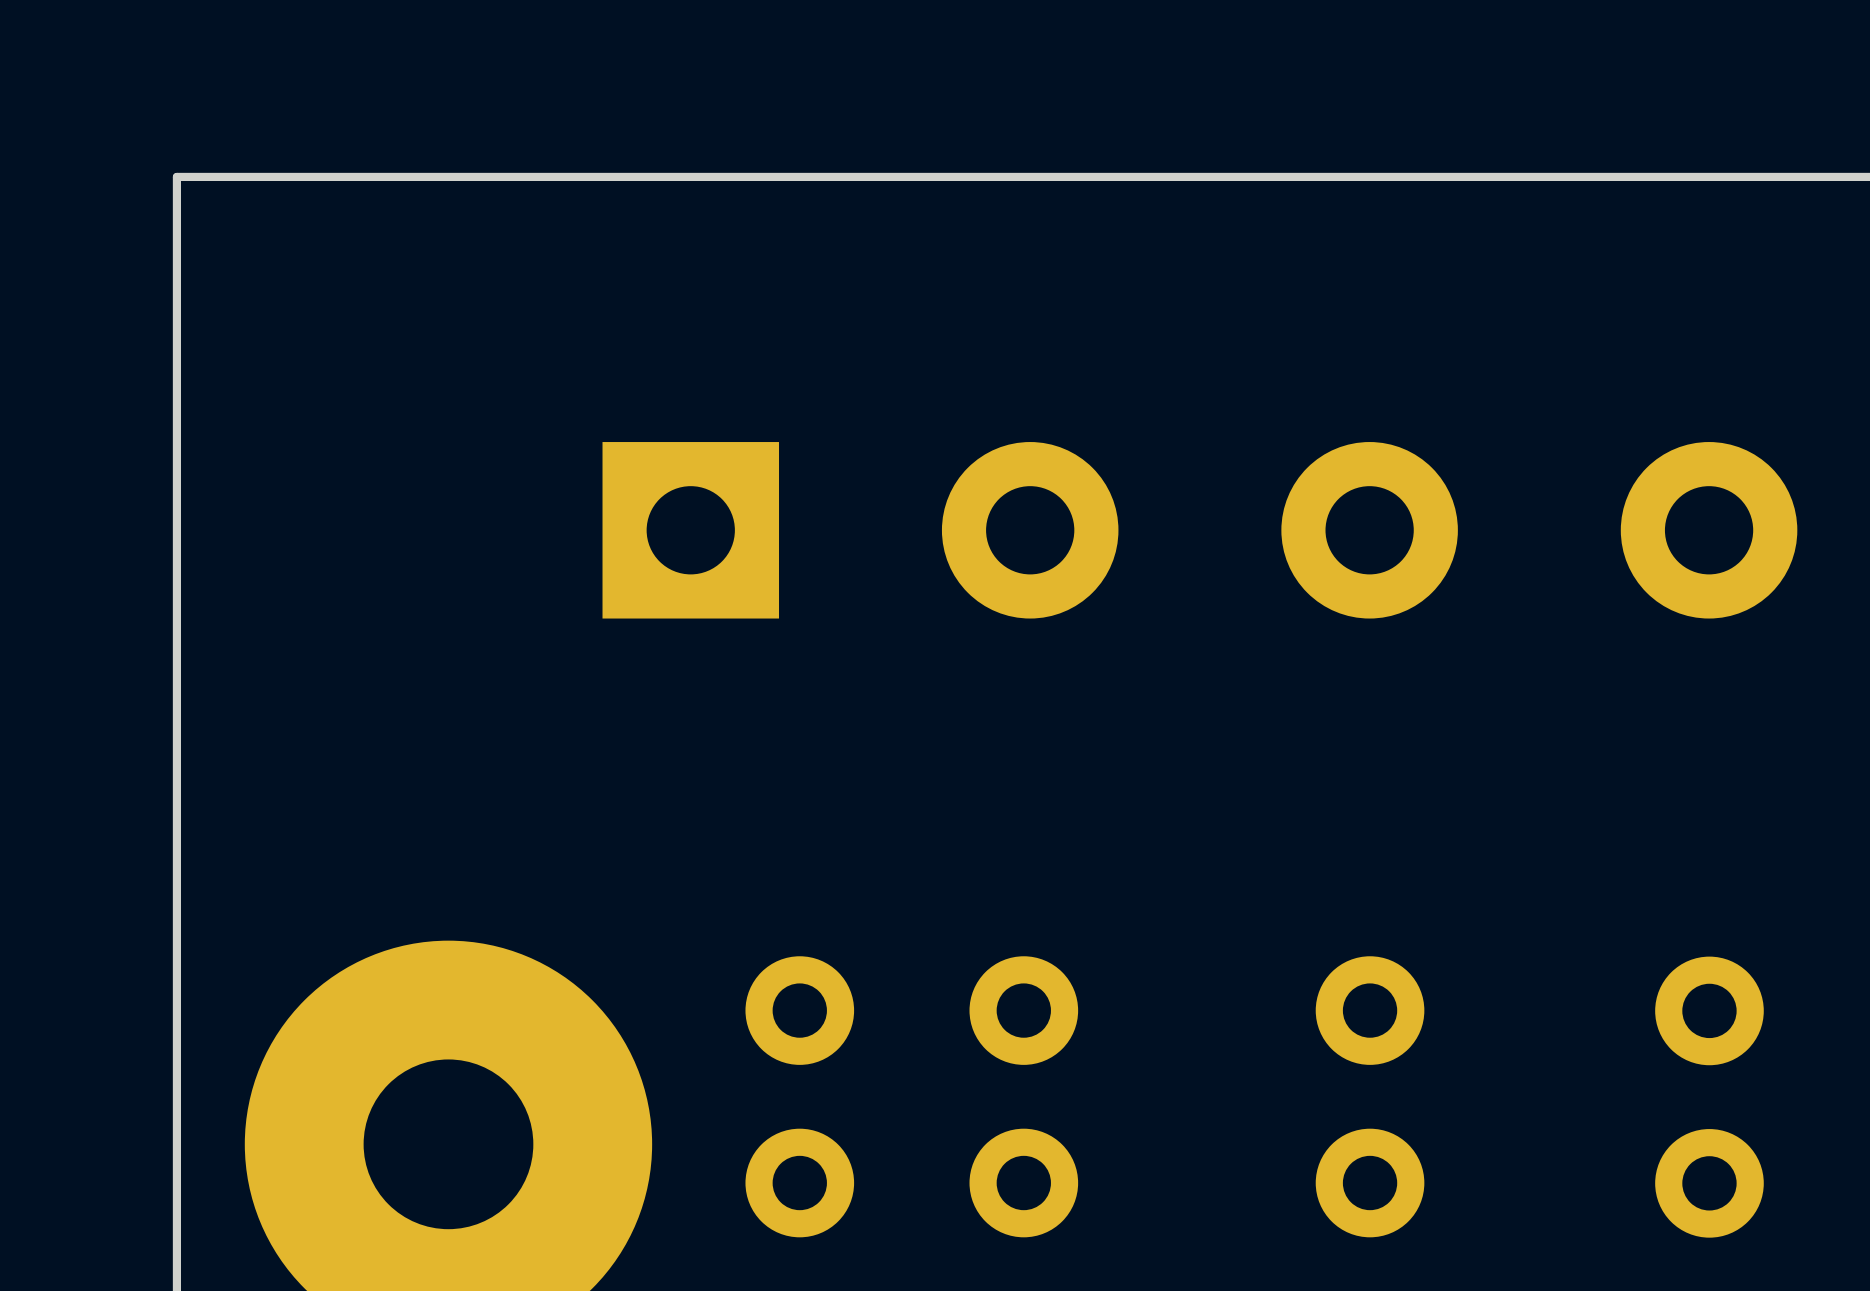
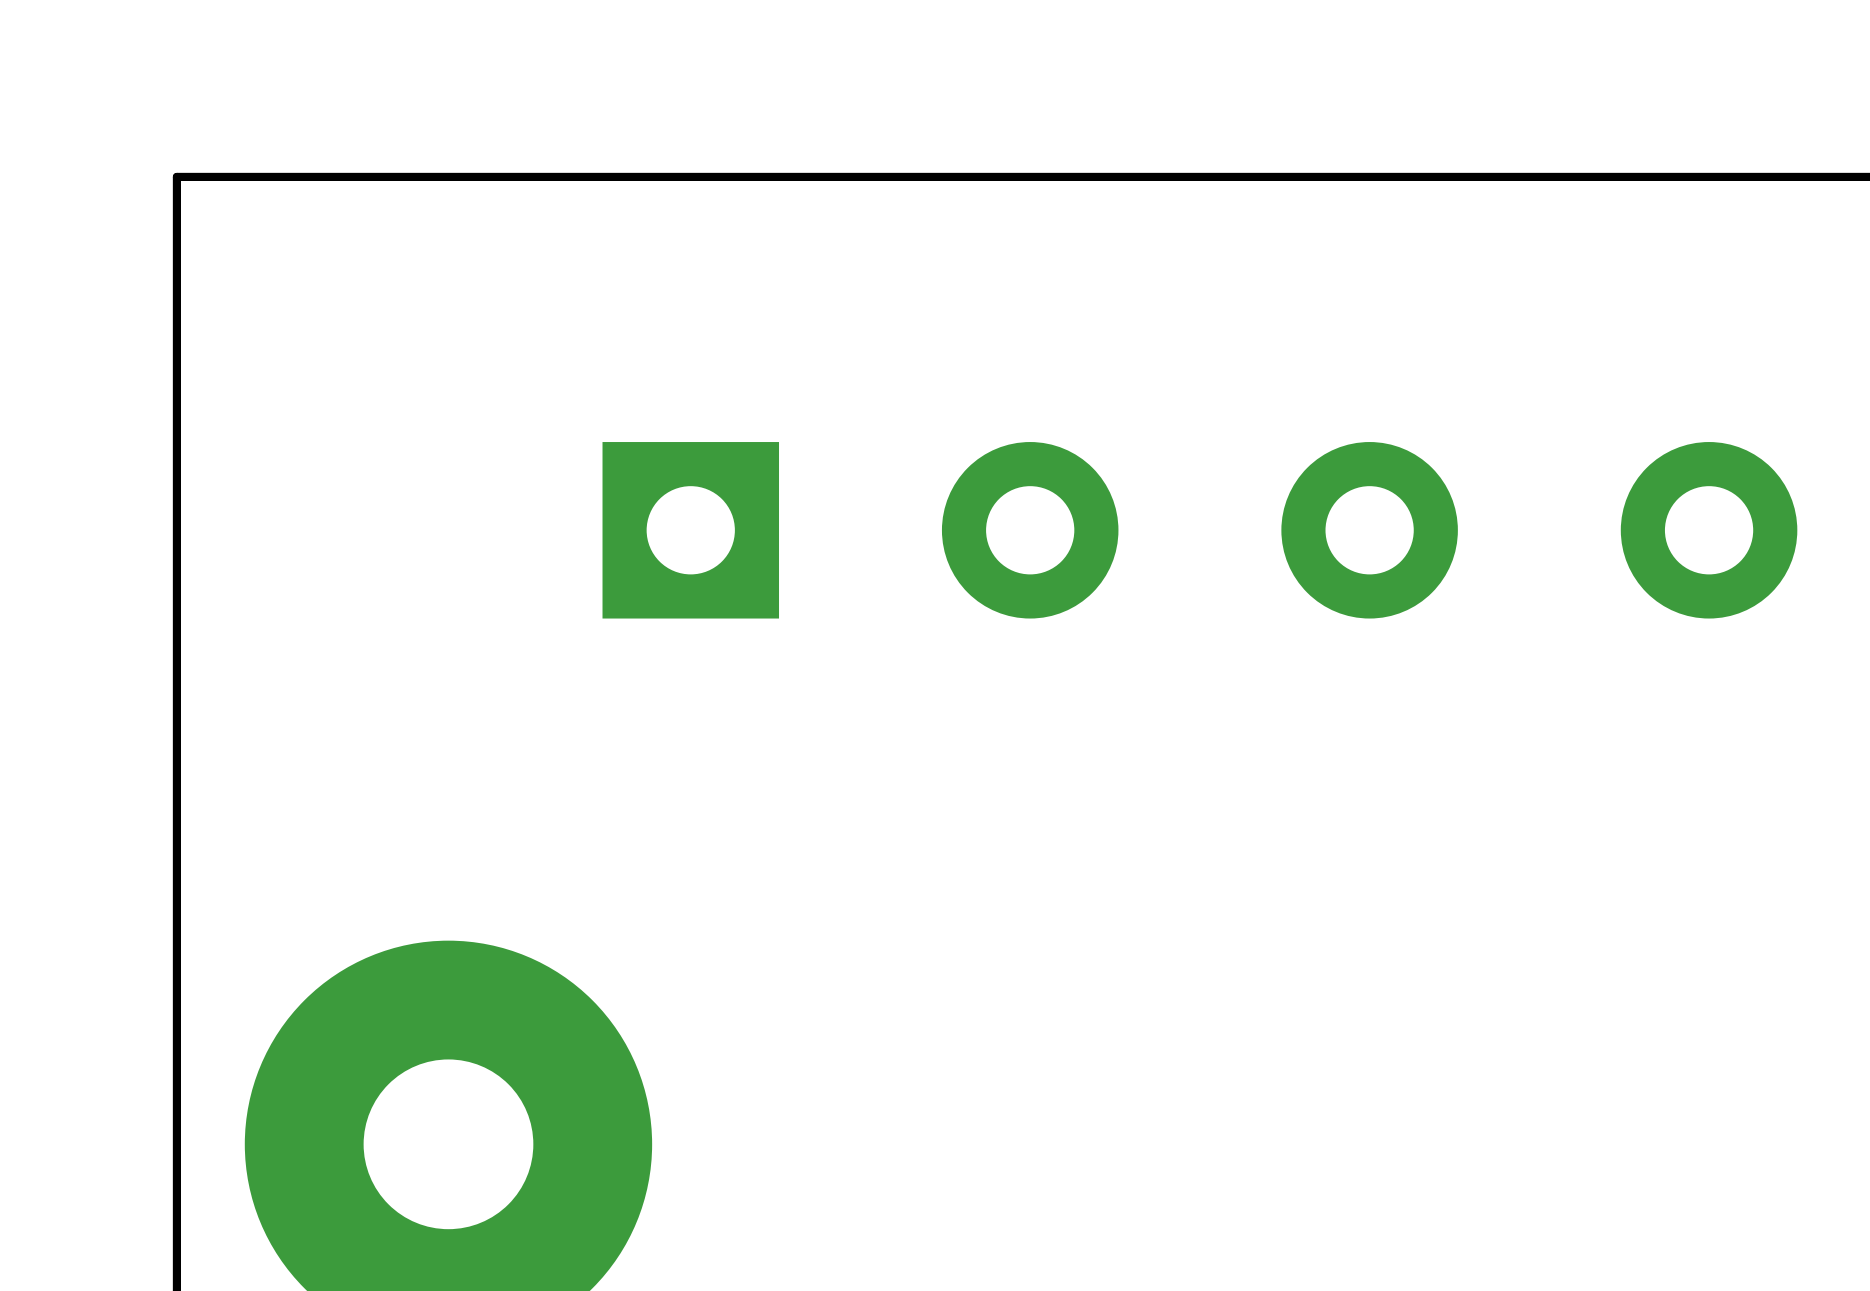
part: (799, 1096) -> none
part: (1023, 1096) -> none
part: (1370, 1096) -> none
part: (1709, 1097) -> none

